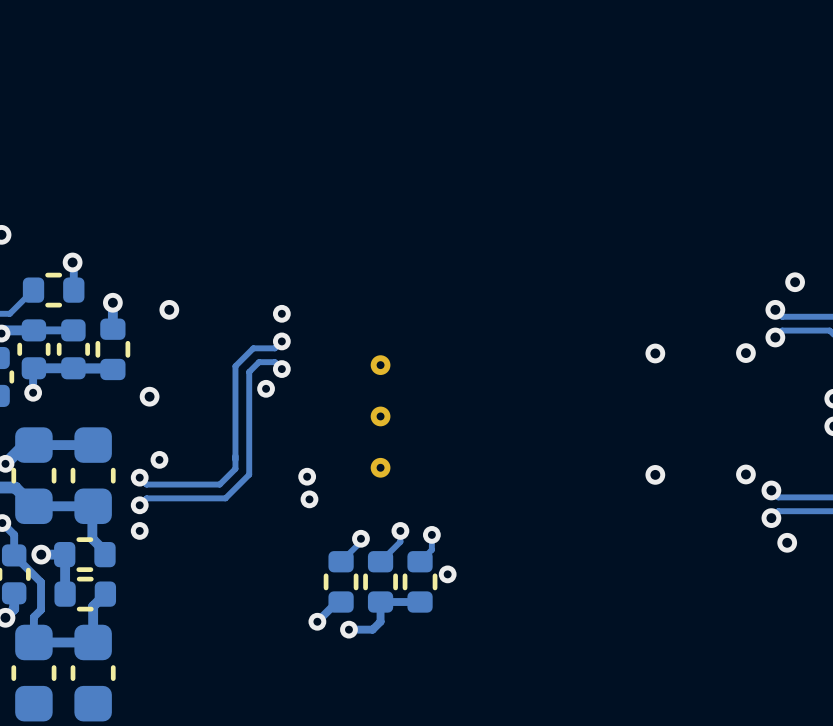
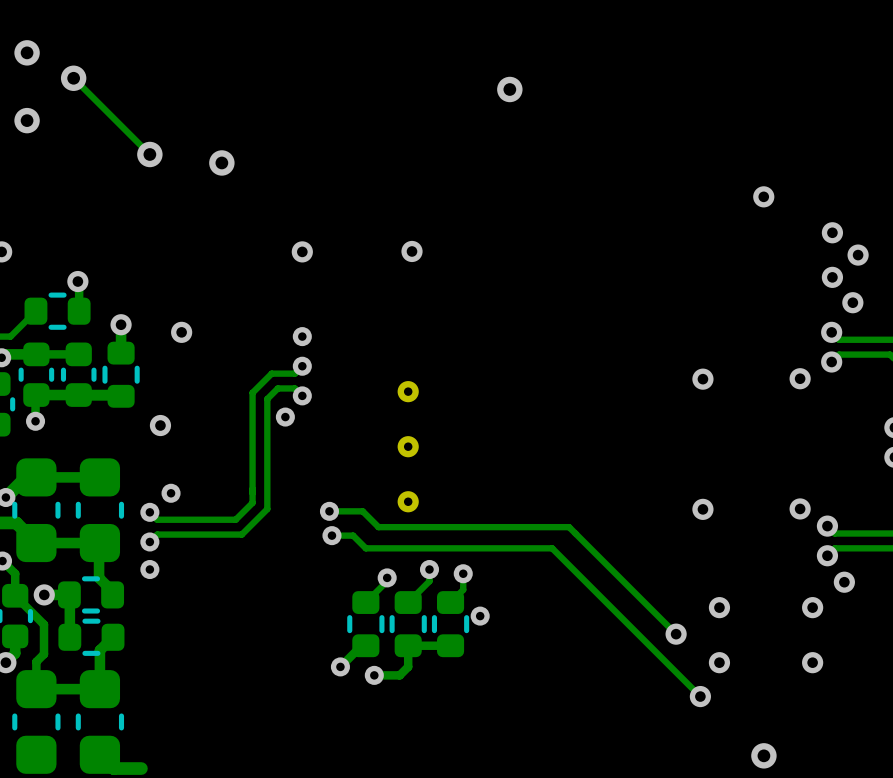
via: none -> (27, 52)
track: none -> (73, 78) (149, 154)
via: none -> (73, 78)
via: none -> (509, 89)
via: none -> (27, 120)
via: none -> (149, 154)
via: none -> (221, 162)
via: none -> (763, 196)
via: none -> (832, 232)
via: none -> (302, 251)
via: none -> (412, 251)
via: none -> (858, 255)
via: none -> (832, 277)
track: none -> (329, 511) (362, 511) (378, 527) (569, 527) (676, 634)
track: none -> (331, 535) (353, 535) (365, 548) (552, 548) (700, 696)
via: none -> (719, 607)
via: none -> (812, 607)
via: none -> (676, 634)
via: none -> (719, 662)
via: none -> (812, 662)
via: none -> (700, 696)
track: none -> (99, 754) (113, 768) (141, 768)
via: none -> (763, 755)

